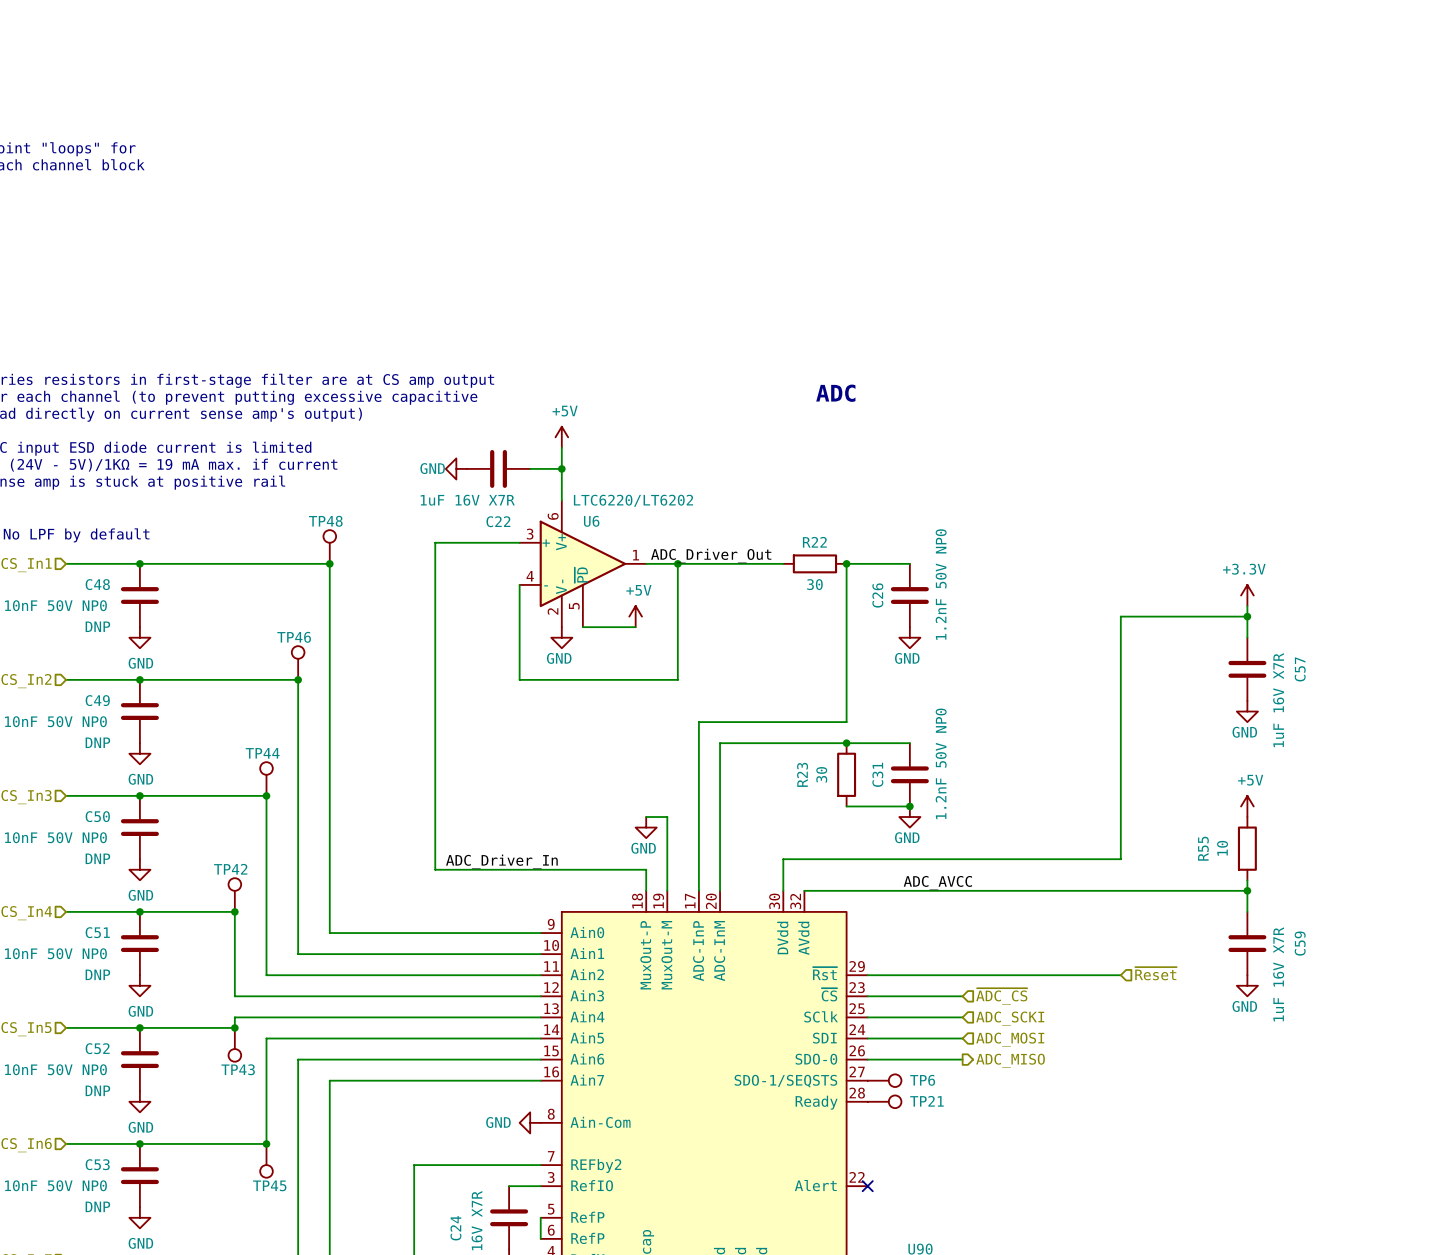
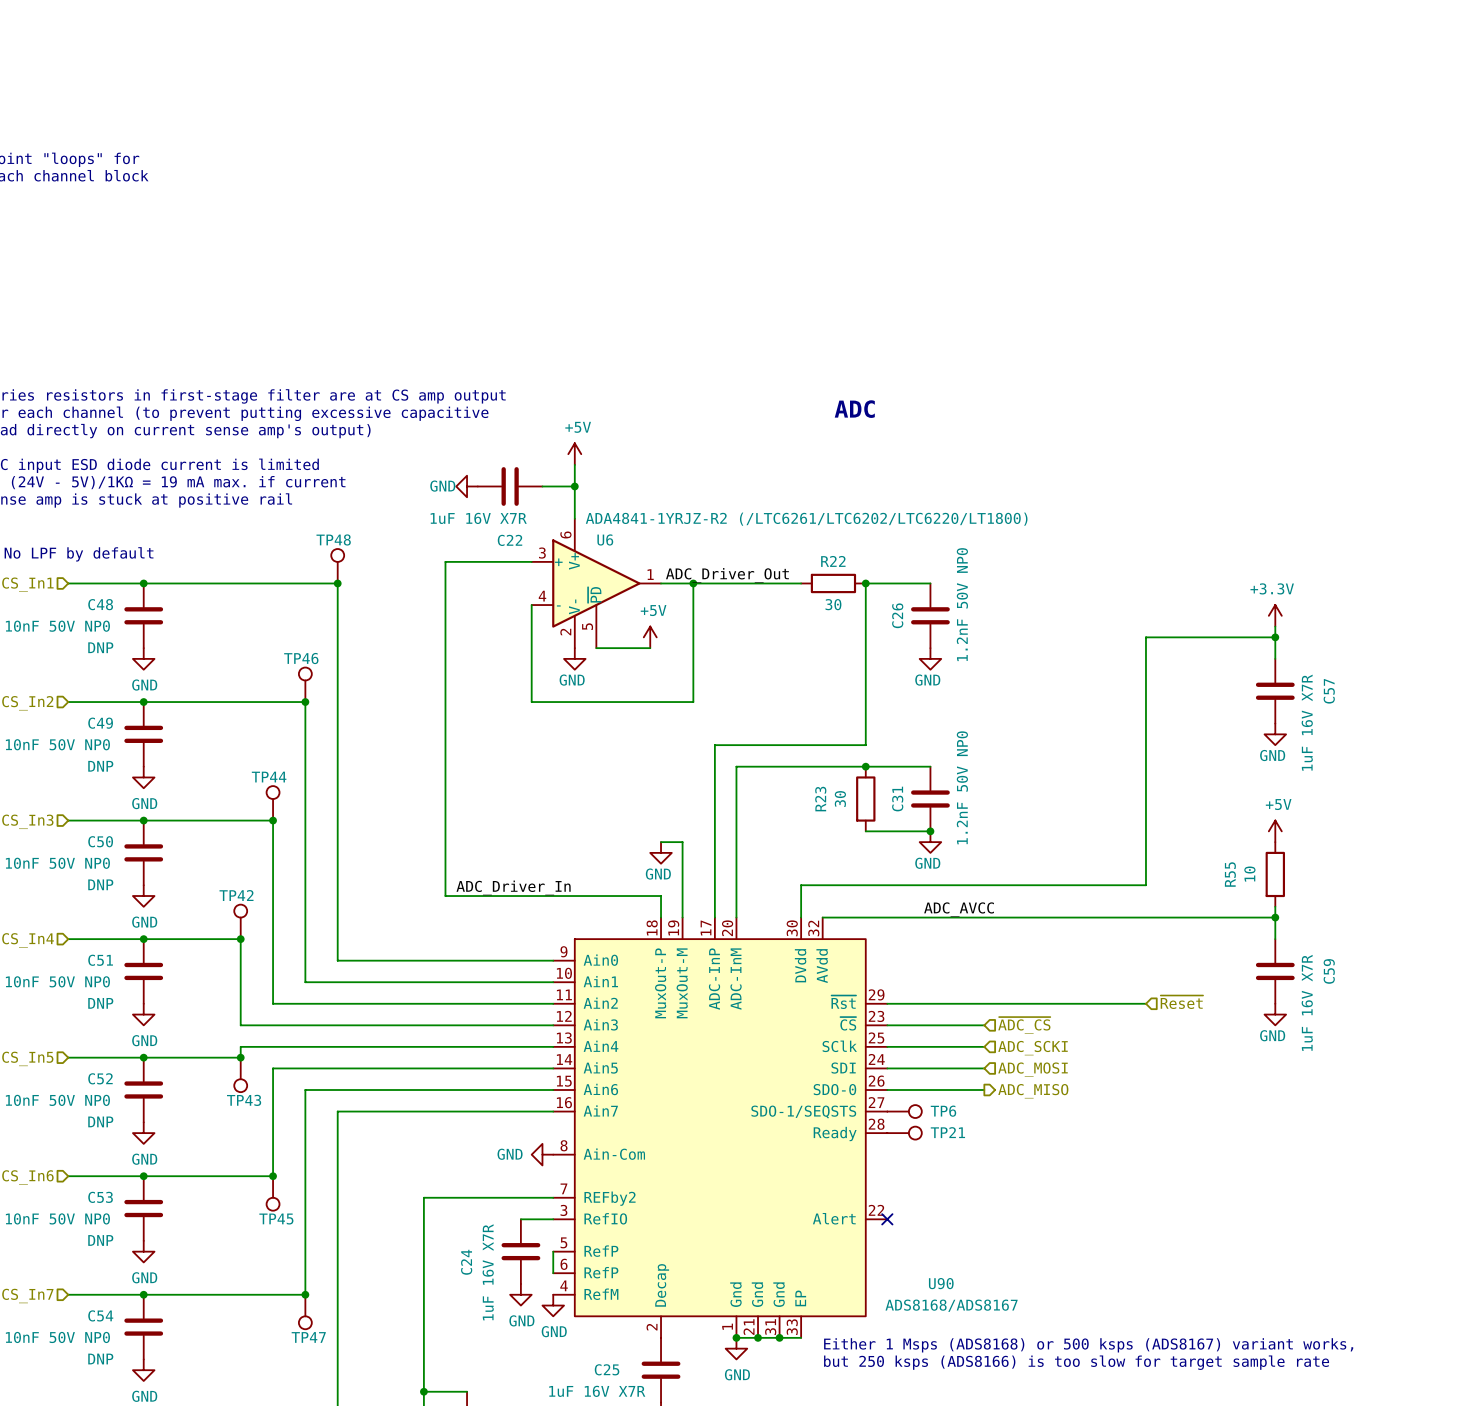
U6 value: LTC6220/LT6202 (633, 500) -> ADA4841-1YRJZ-R2 (/LTC6261/LTC6202/LTC6220/LT1800) (806, 519)

